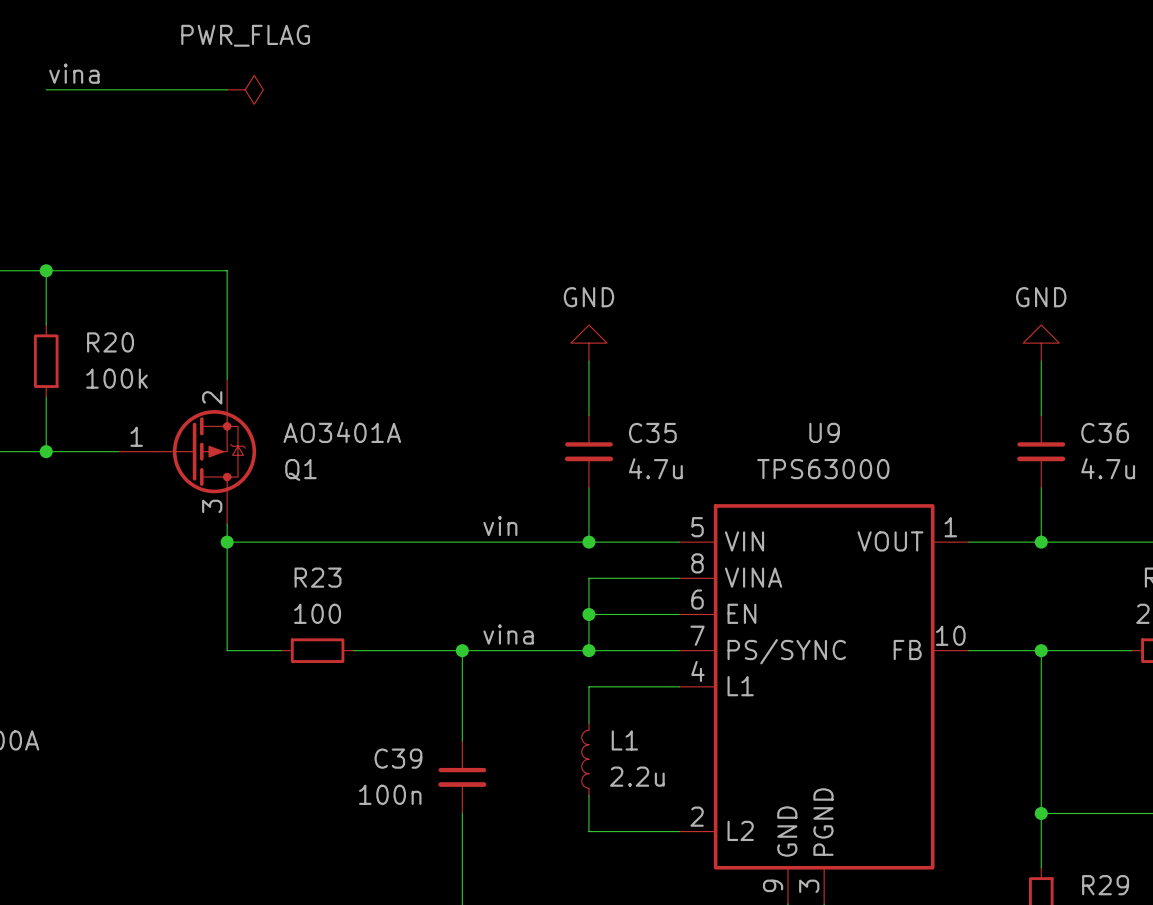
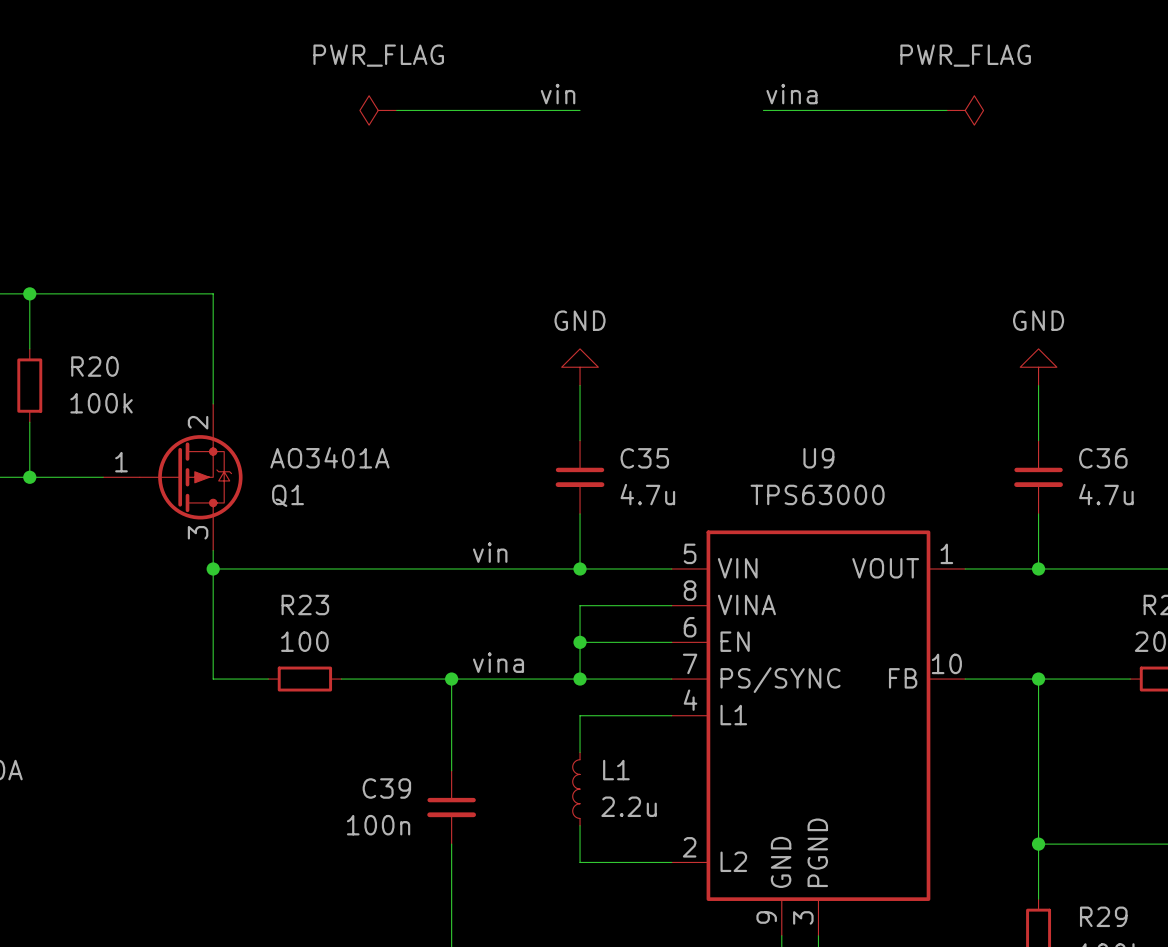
label: vina (74, 73) -> none
label: none -> vin (558, 94)
label: none -> vina (791, 94)
wire: (46, 89) (227, 89) -> none
power symbol rotation: 0° (245, 89) -> 180° (378, 110)
power symbol position: PWR_FLAG (245, 89) -> PWR_FLAG (378, 110)
wire: none -> (396, 110) (580, 110)
wire: none -> (763, 110) (946, 110)
power symbol: none -> PWR_FLAG (965, 110)

